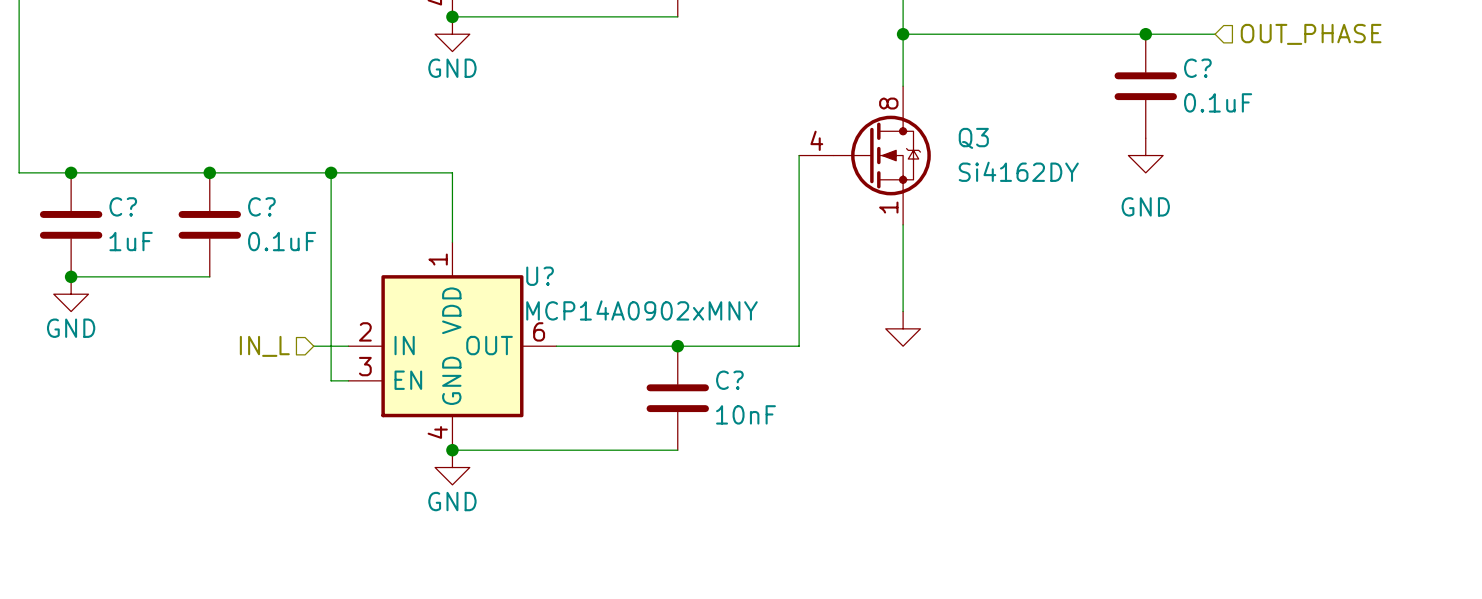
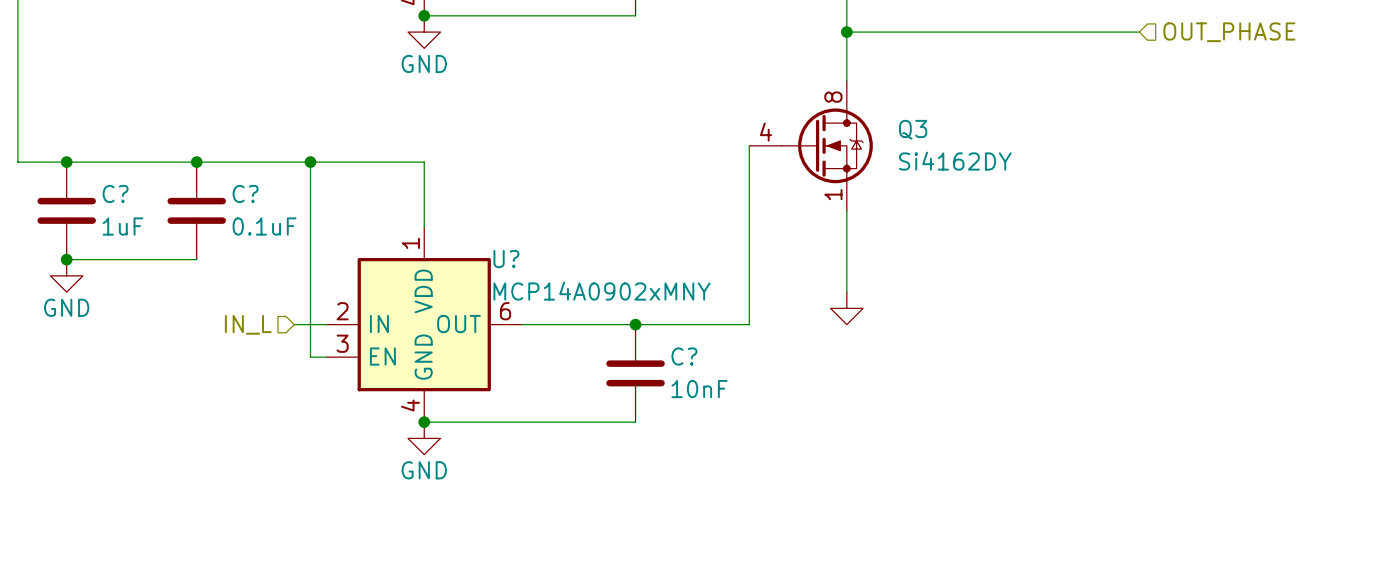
junction: (1145, 34) -> none
C?: 0.1uF (1145, 86) -> none
power symbol: GND (1145, 155) -> none

